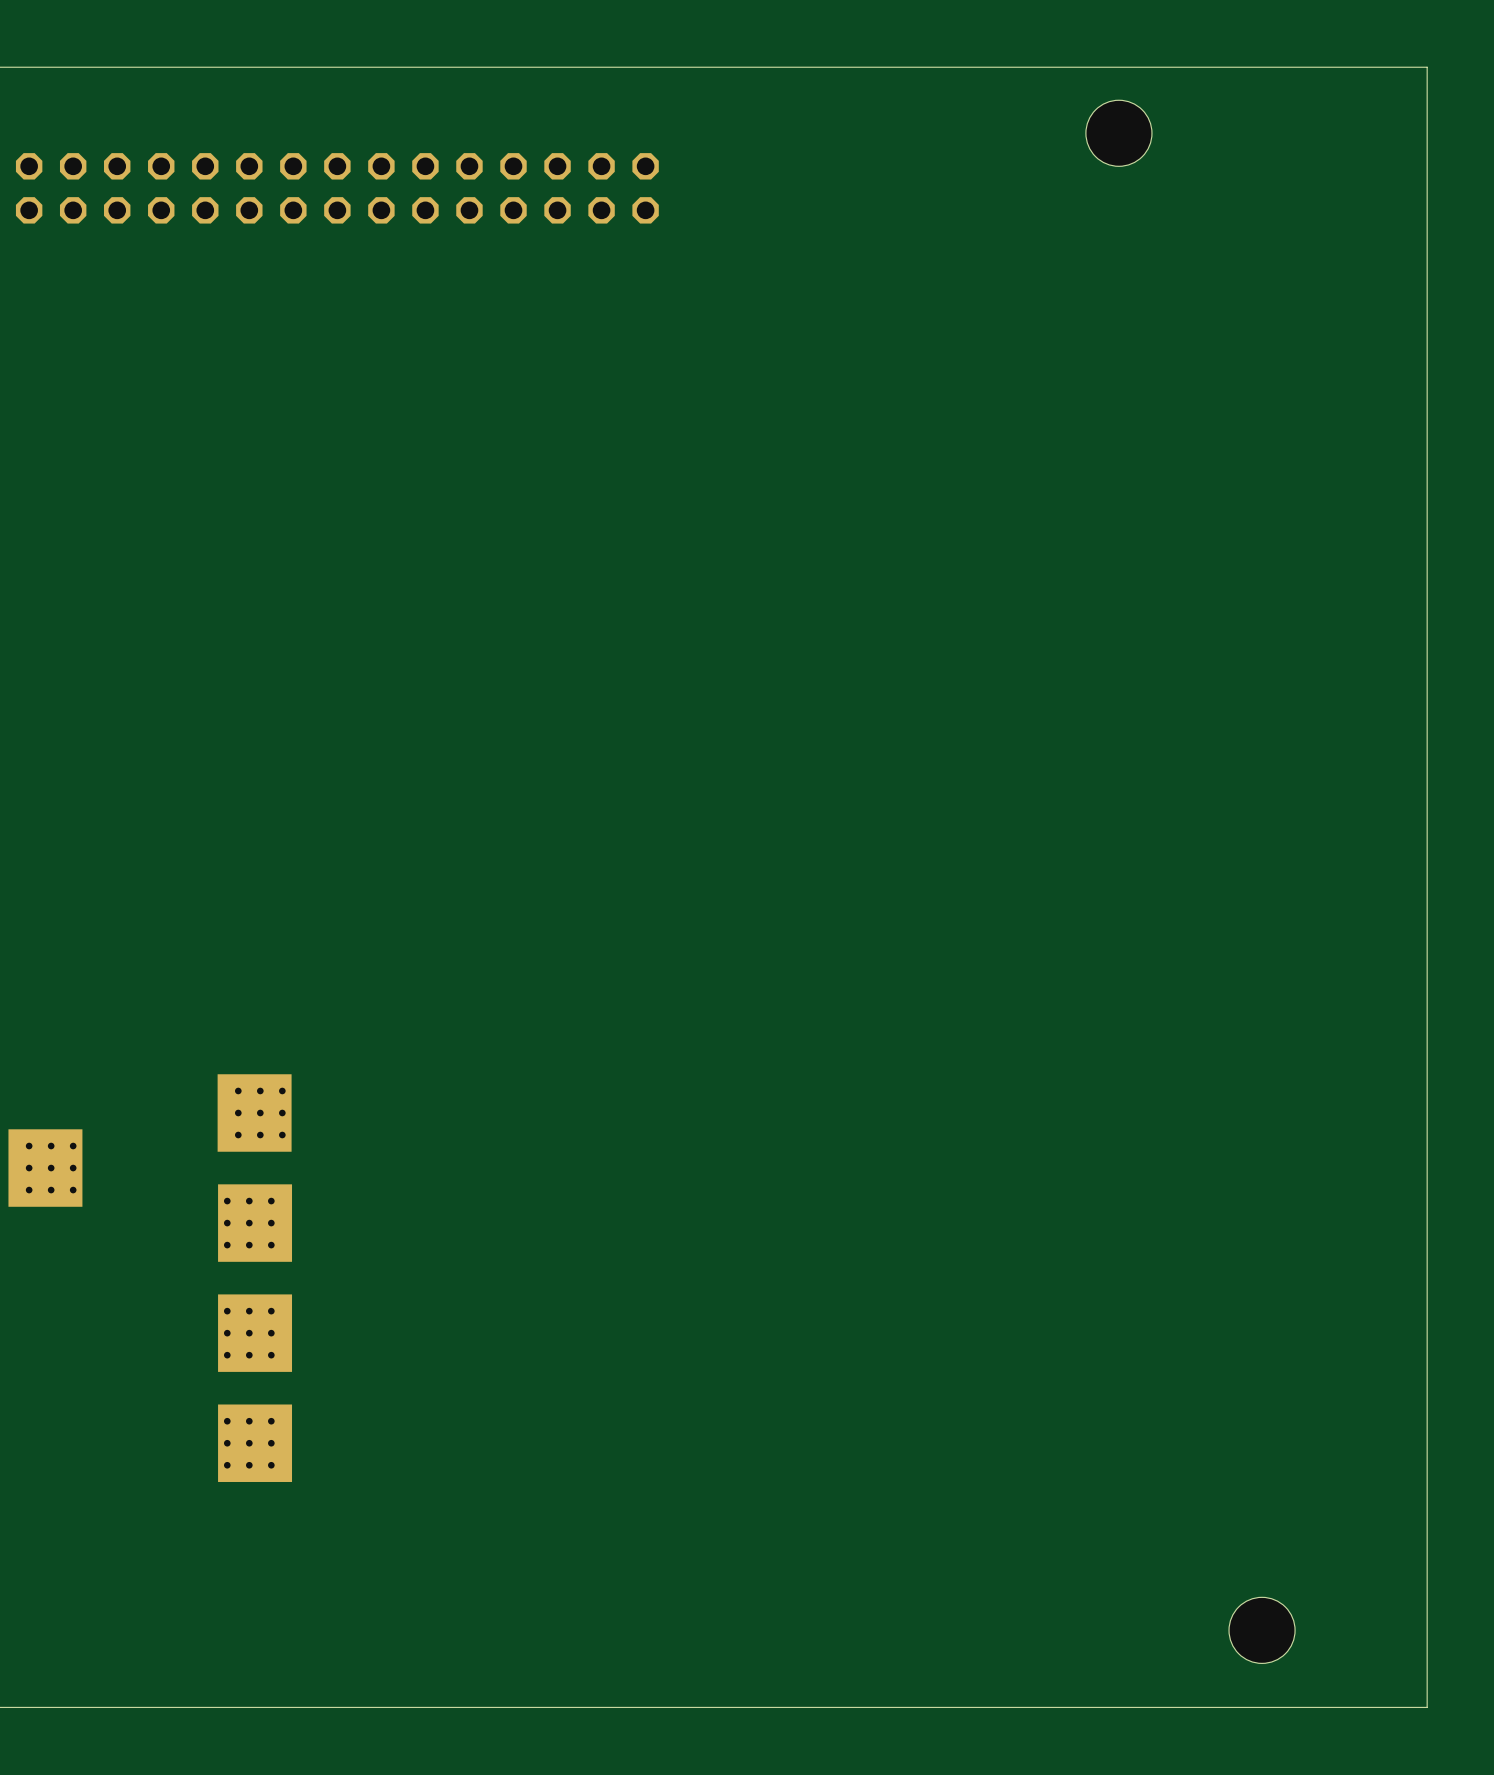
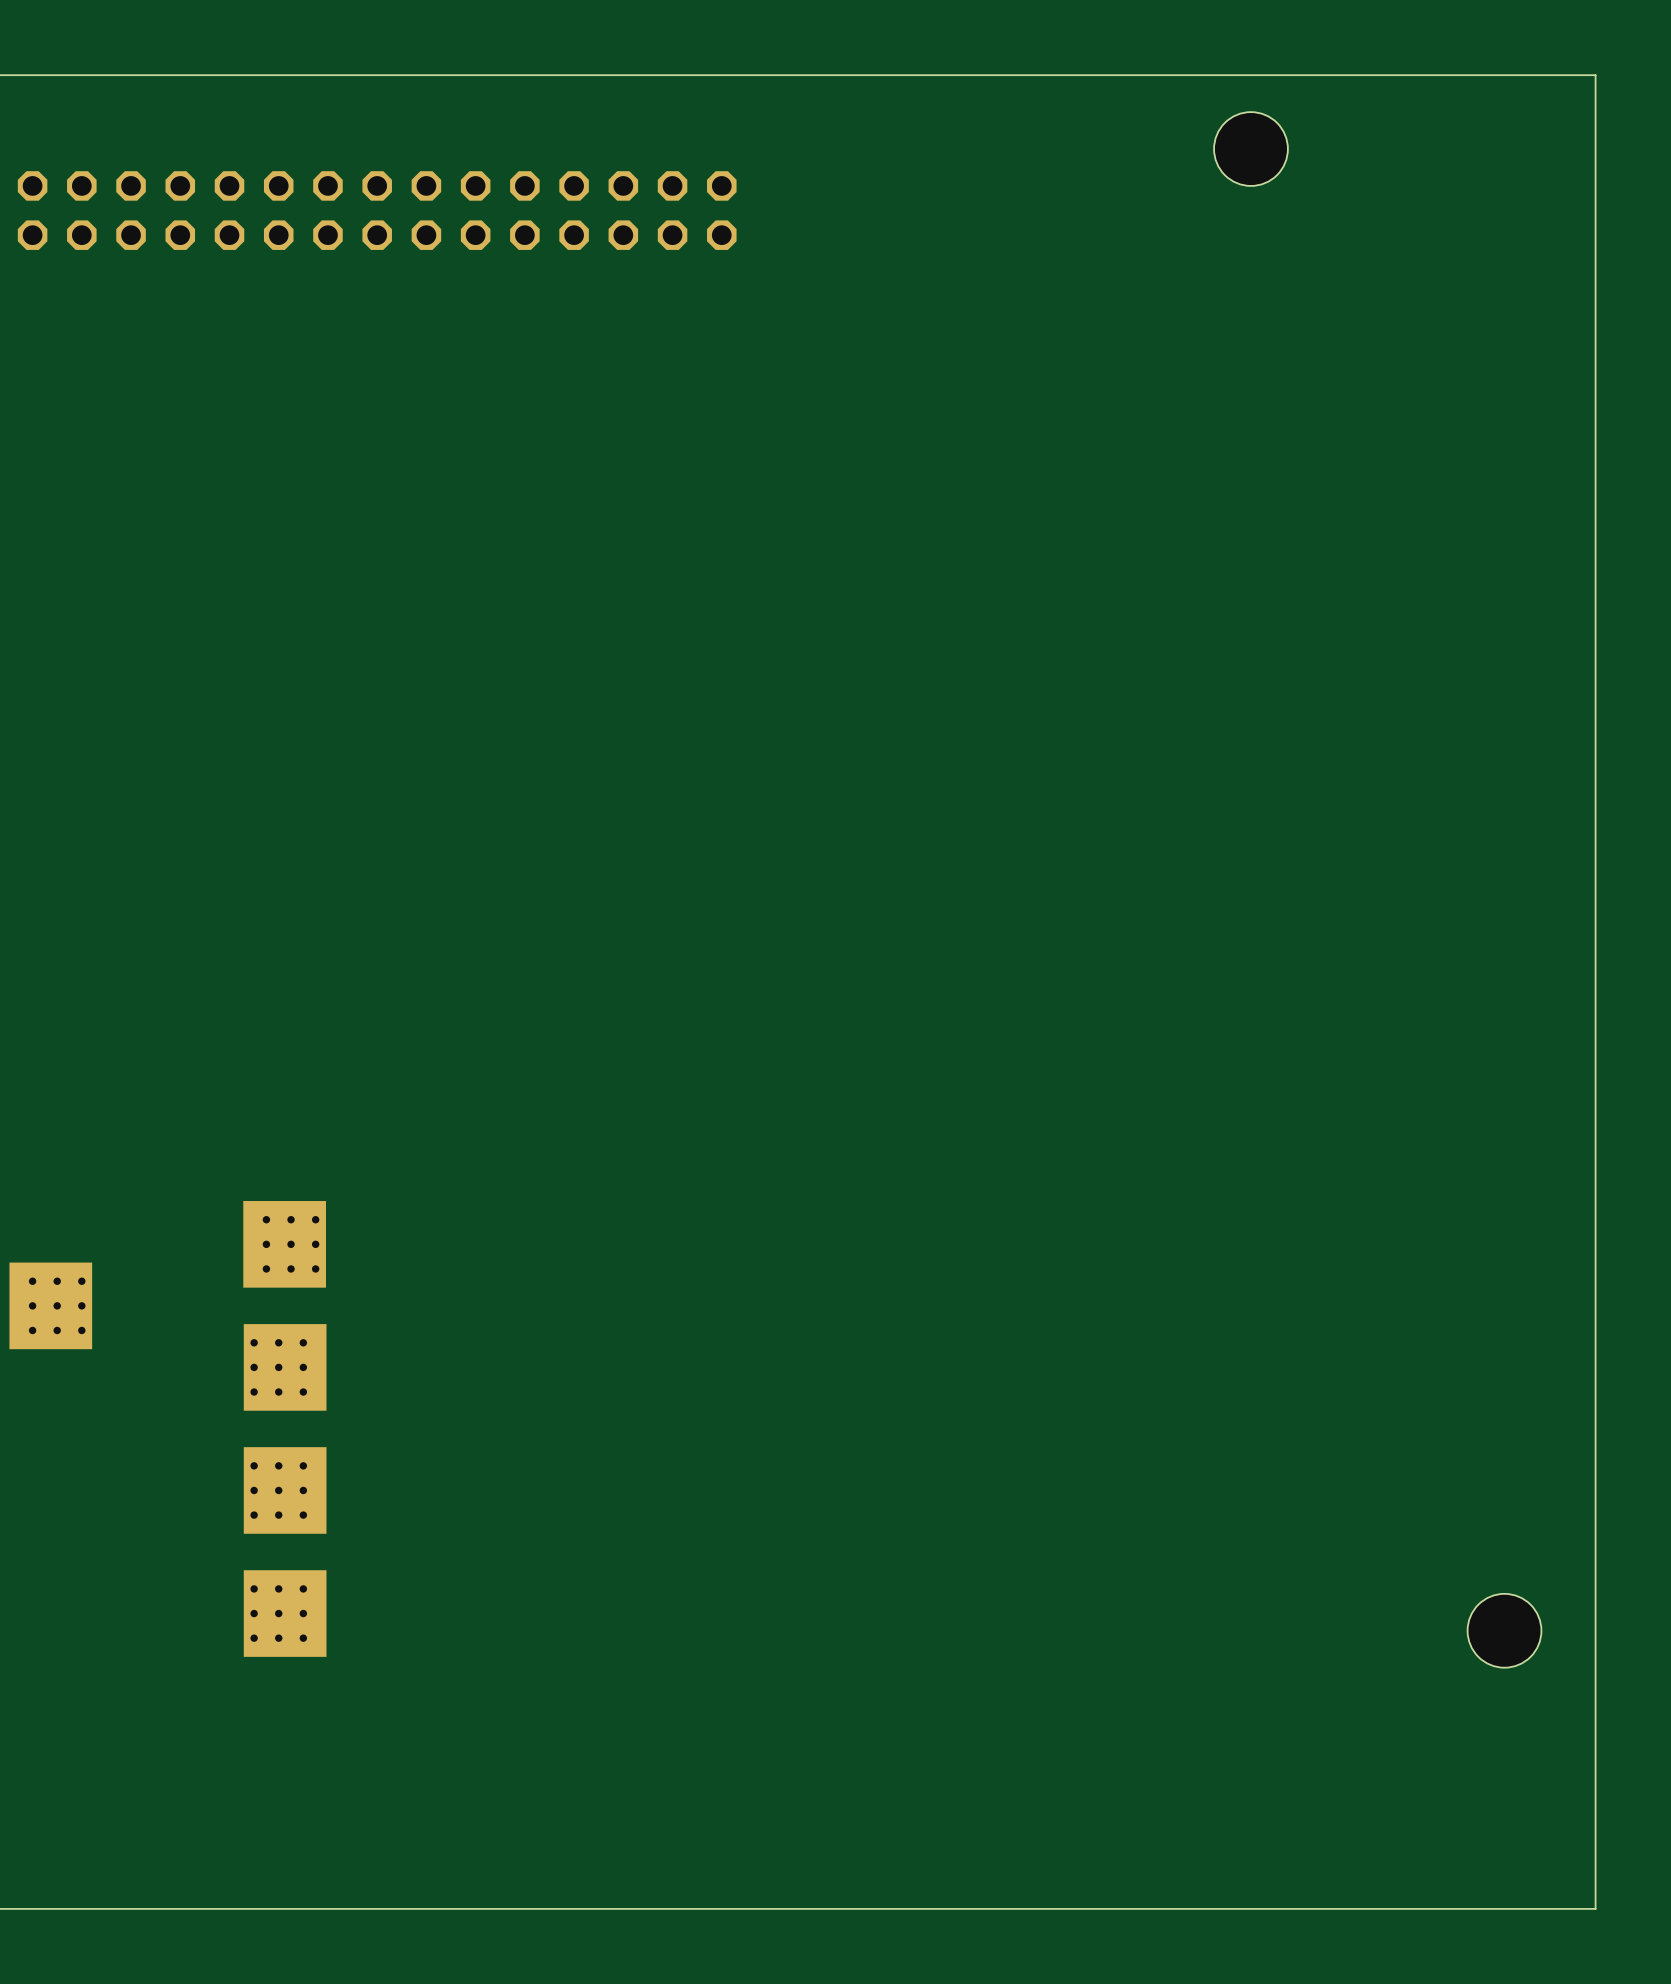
hole position: (1262, 1630) -> (1504, 1630)

